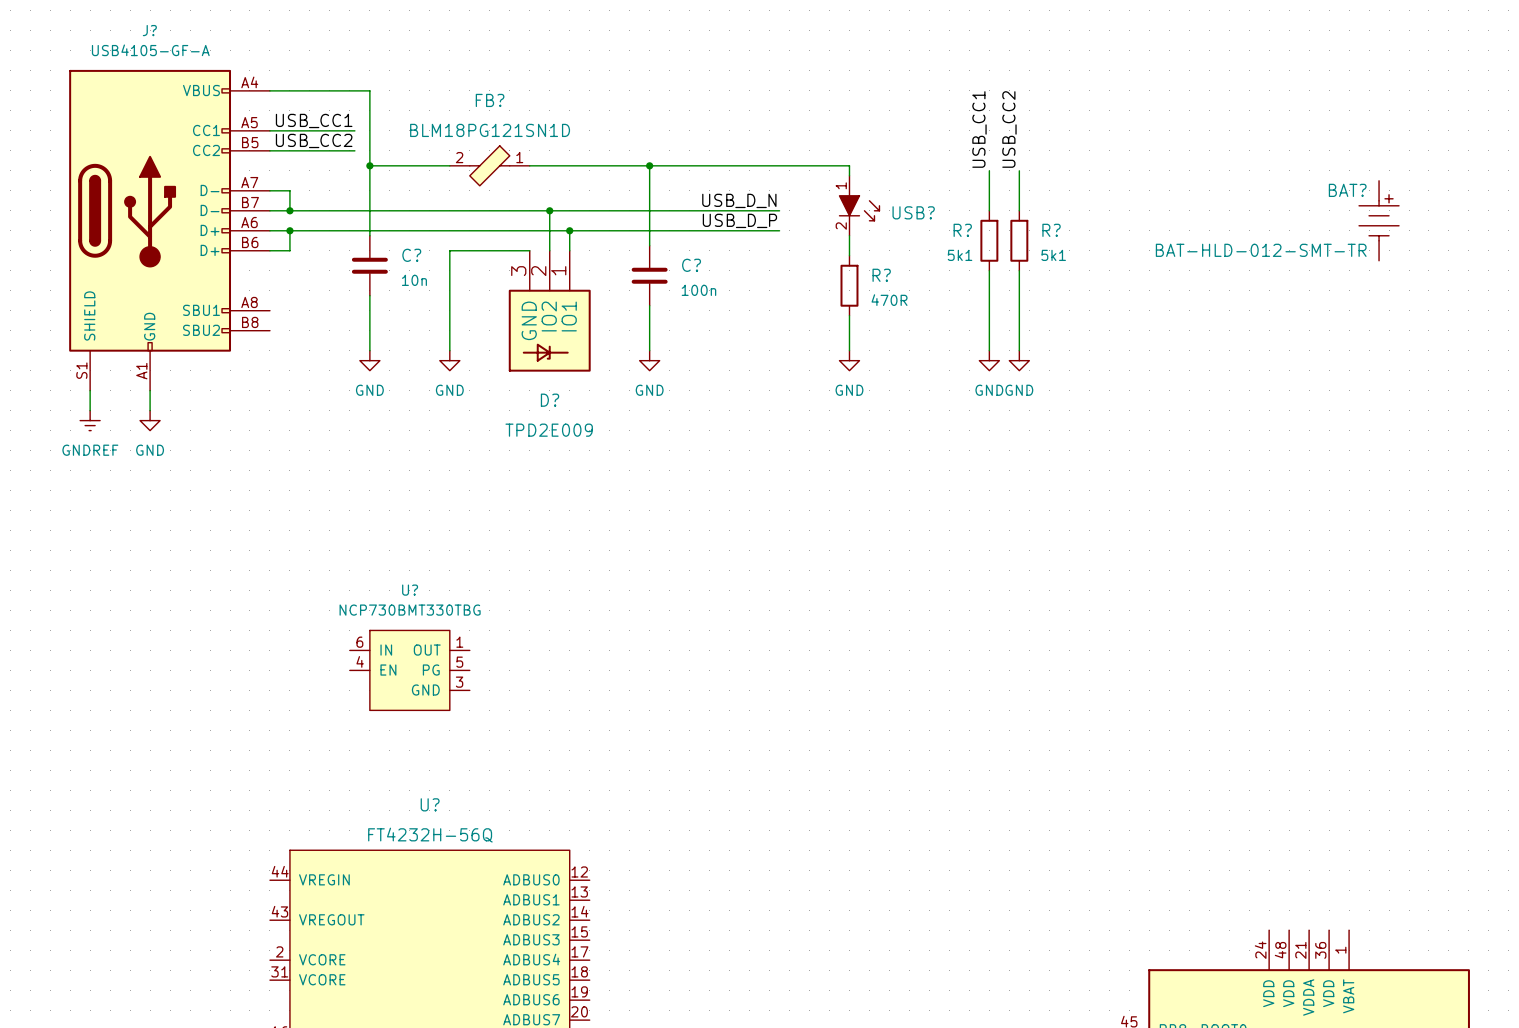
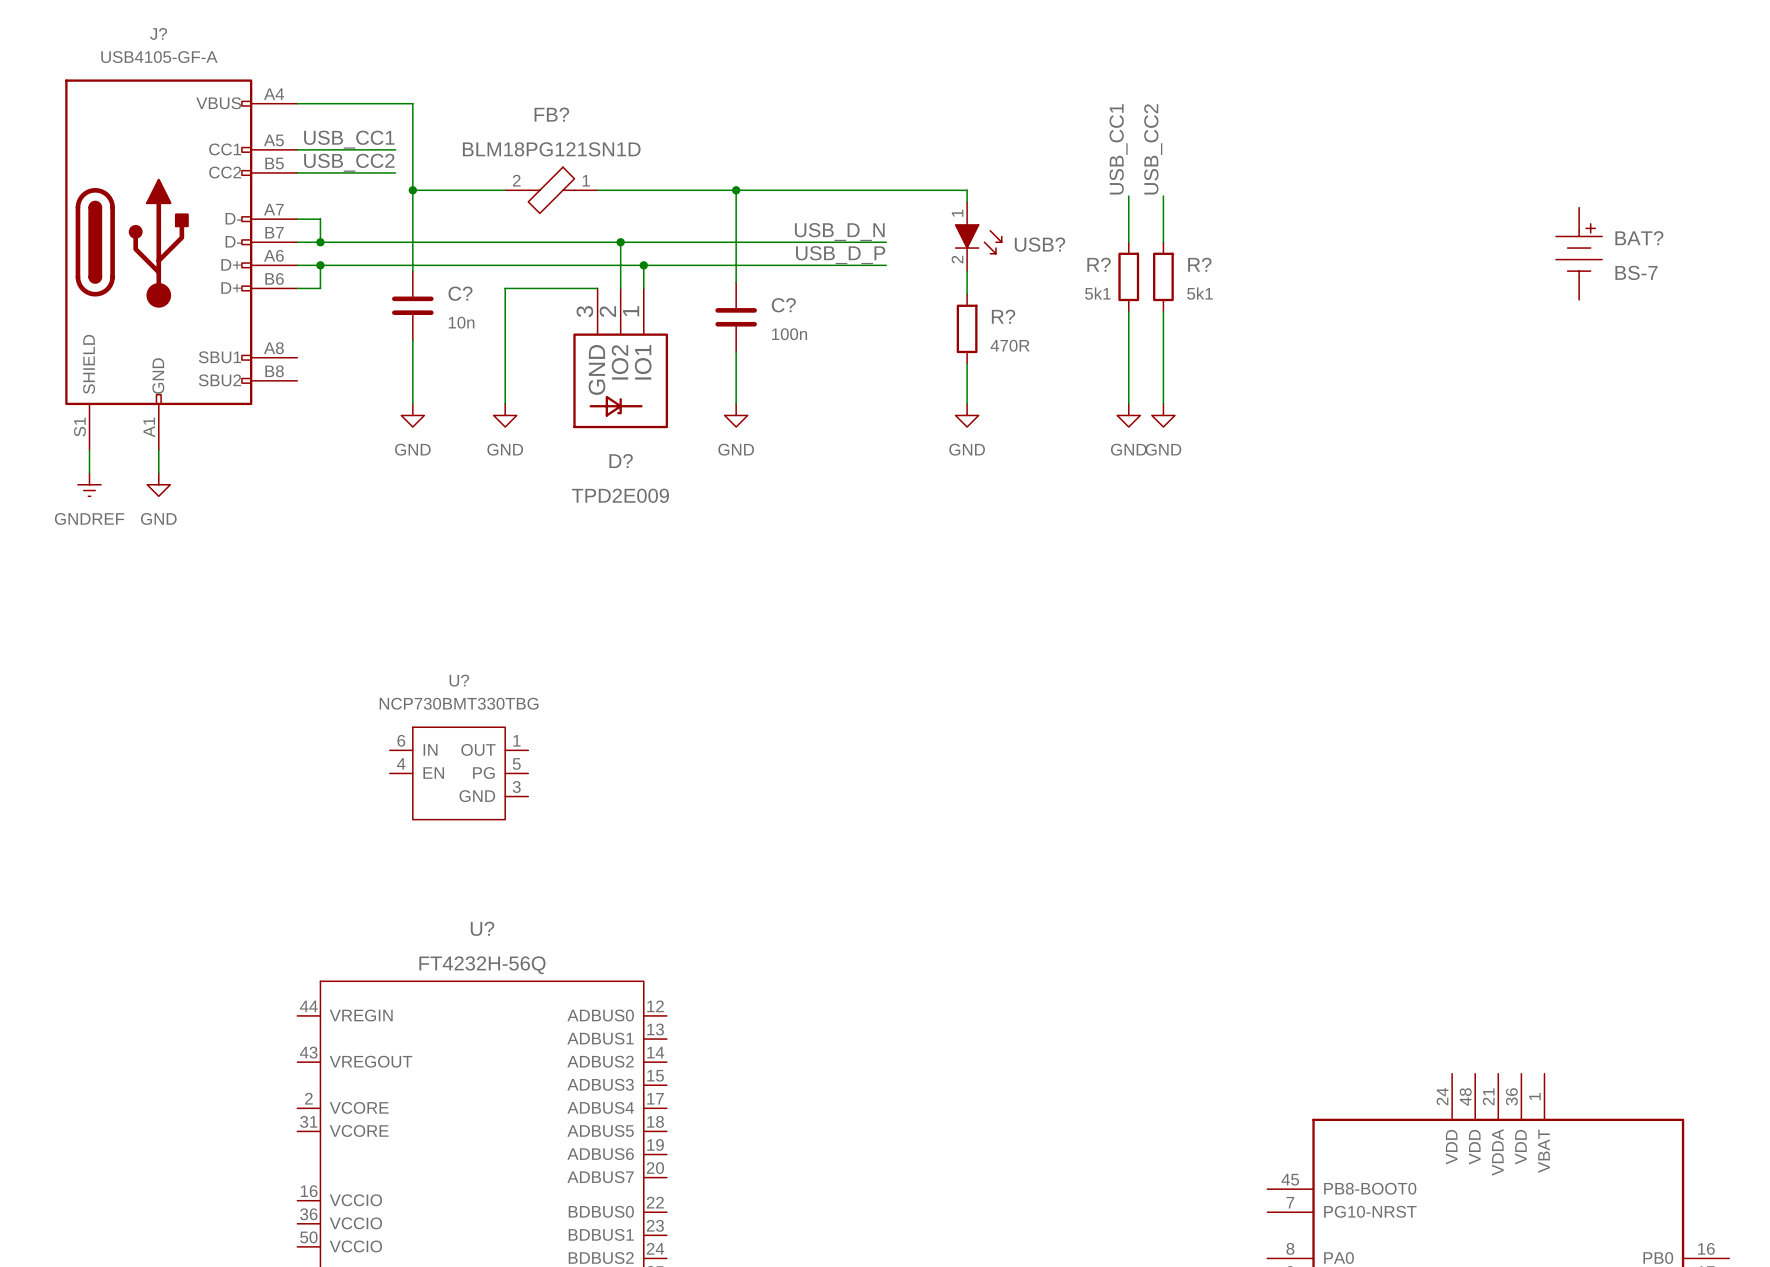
BAT? name position: BAT? (1347, 190) -> BAT? (1639, 238)
BAT? value: BAT-HLD-012-SMT-TR (1261, 250) -> BS-7 (1636, 272)

